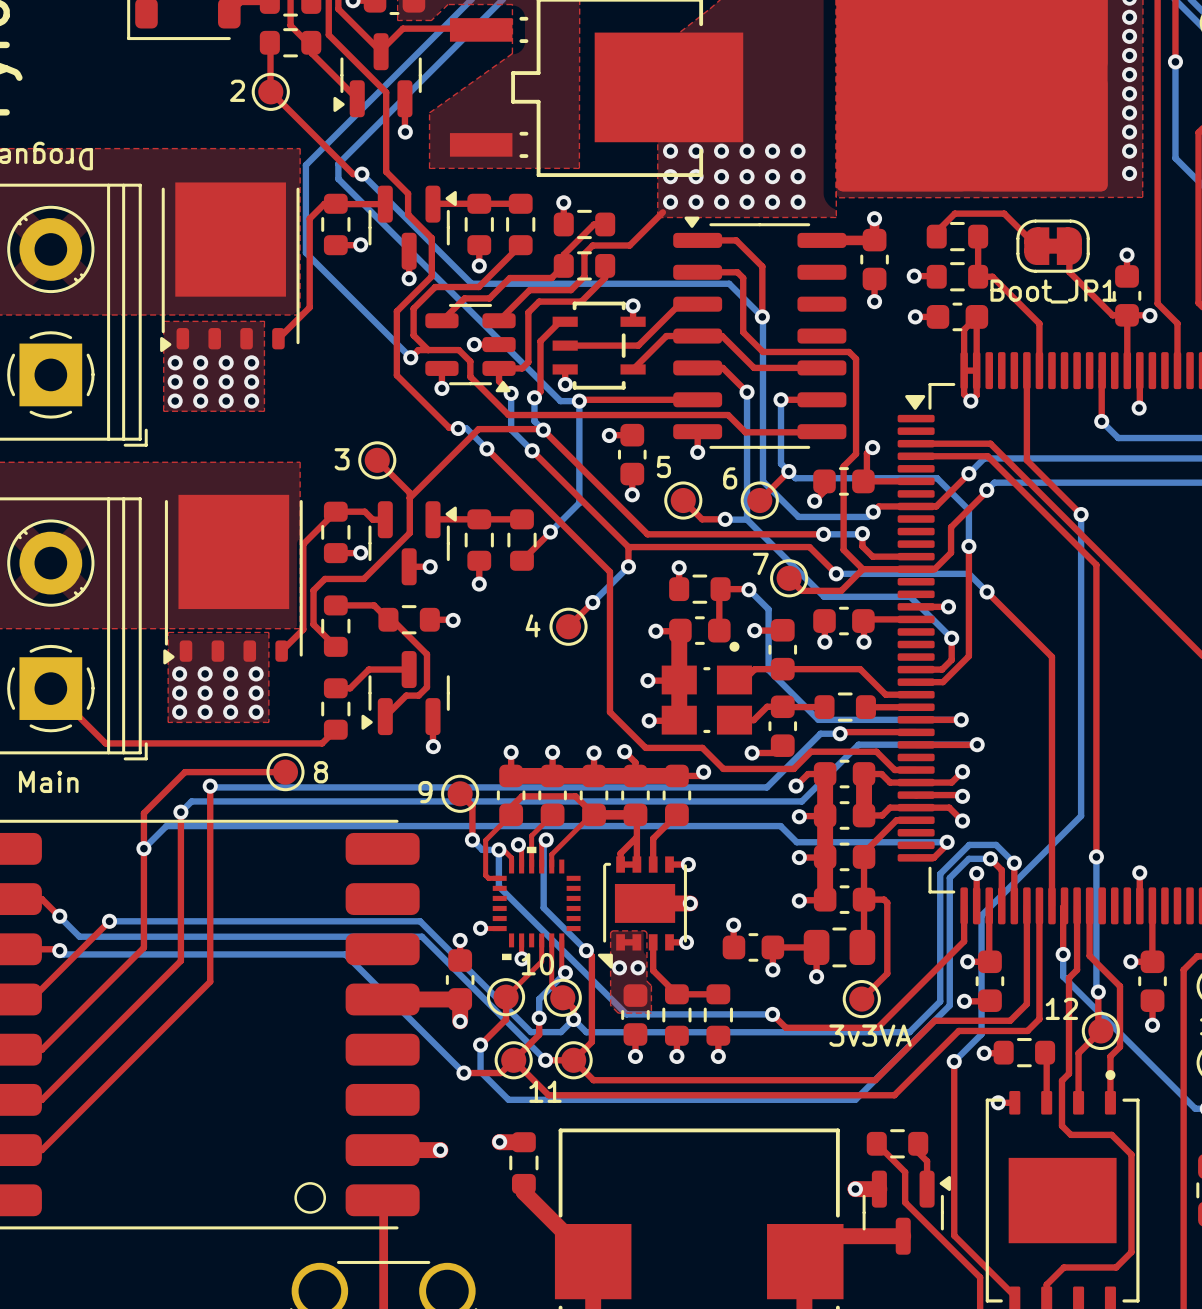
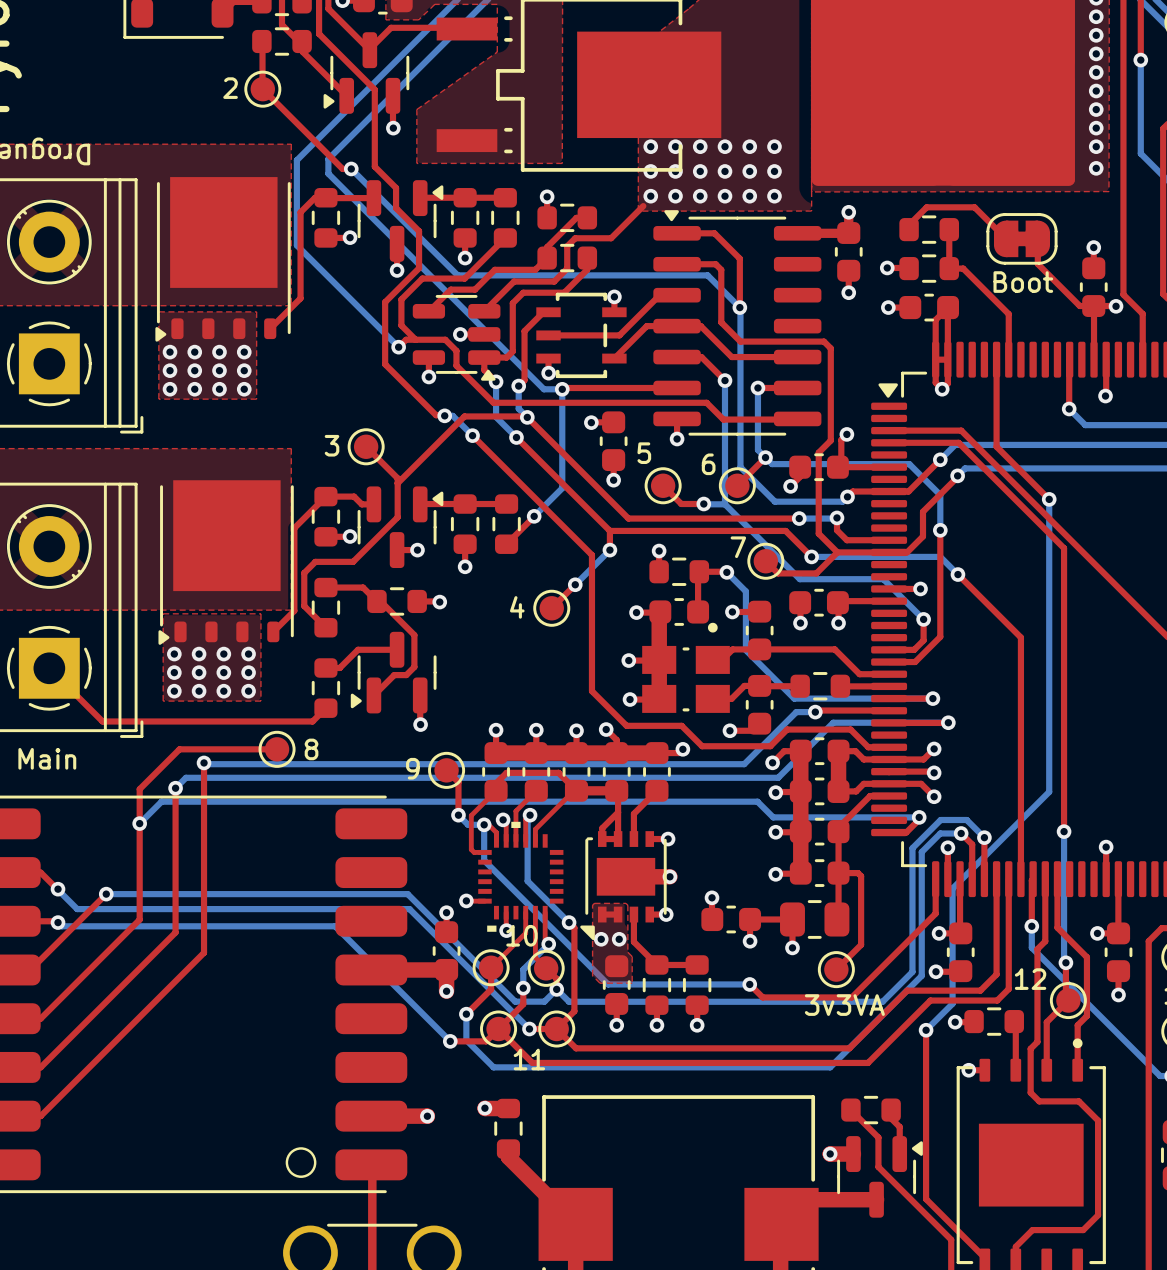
Boot_JP1 name: Boot_JP1 (1053, 291) -> Boot (1023, 282)

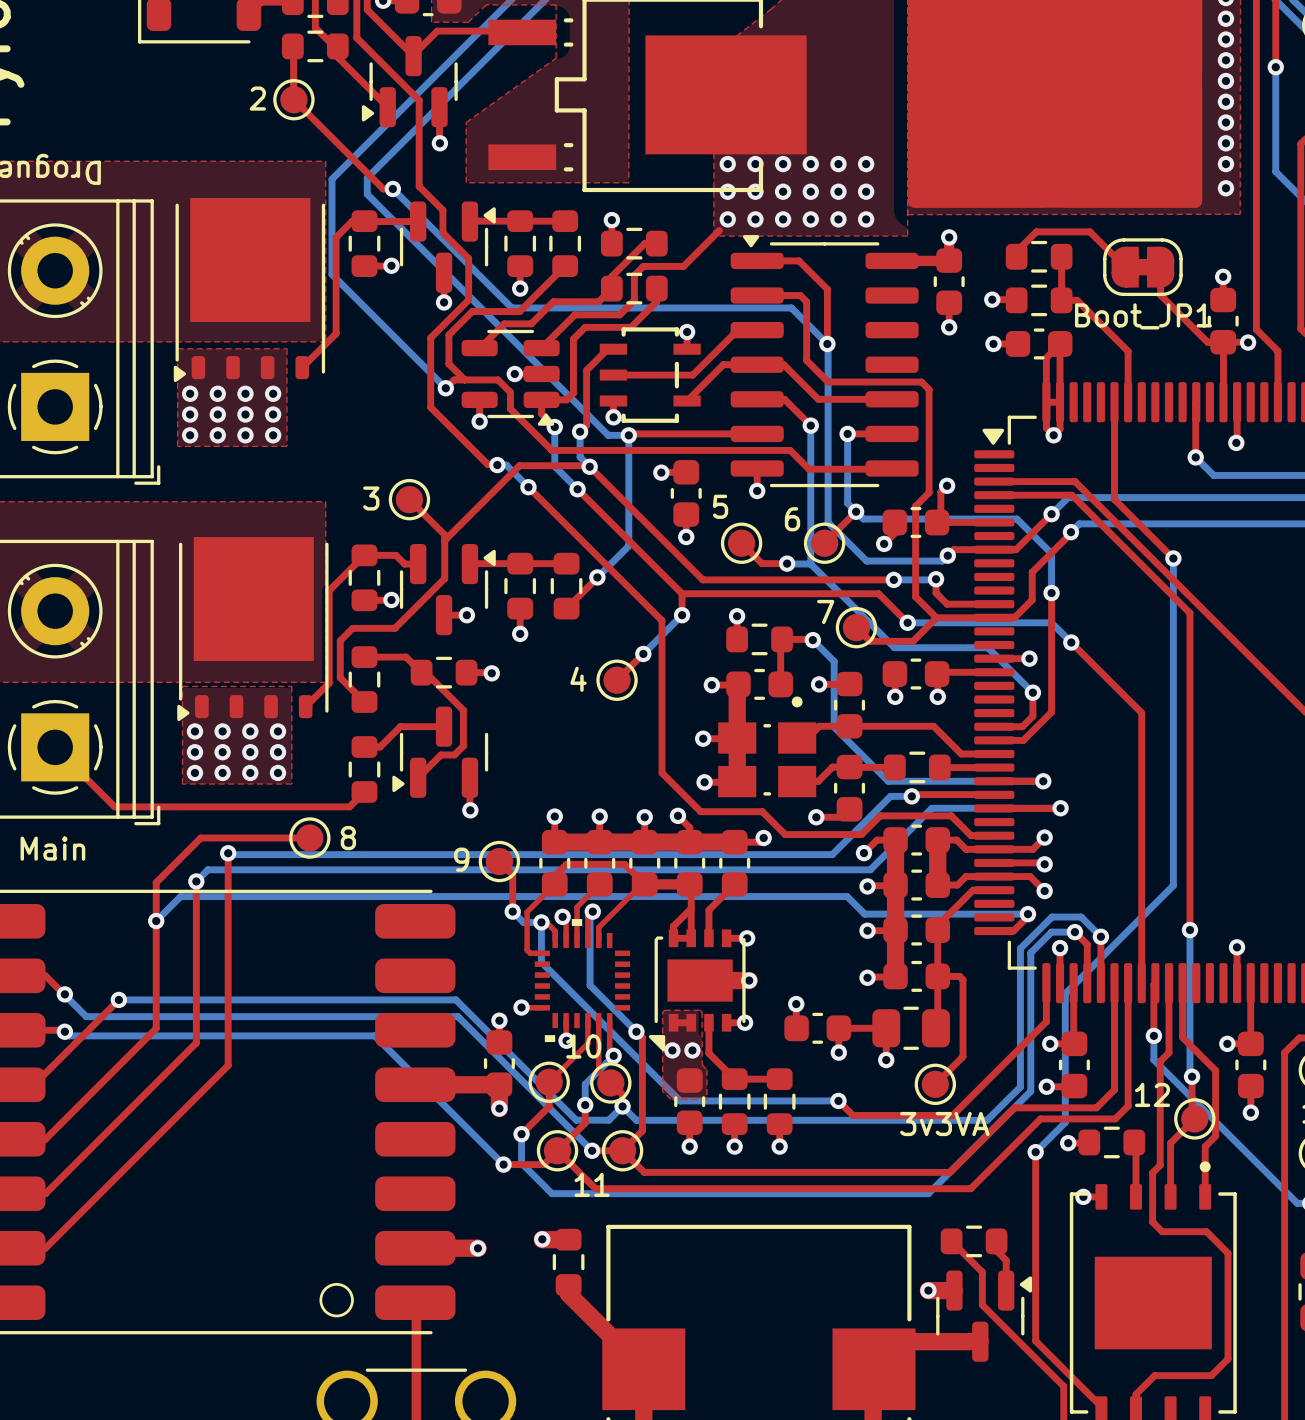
Boot name: Boot (1023, 282) -> Boot_JP1 (1143, 316)

